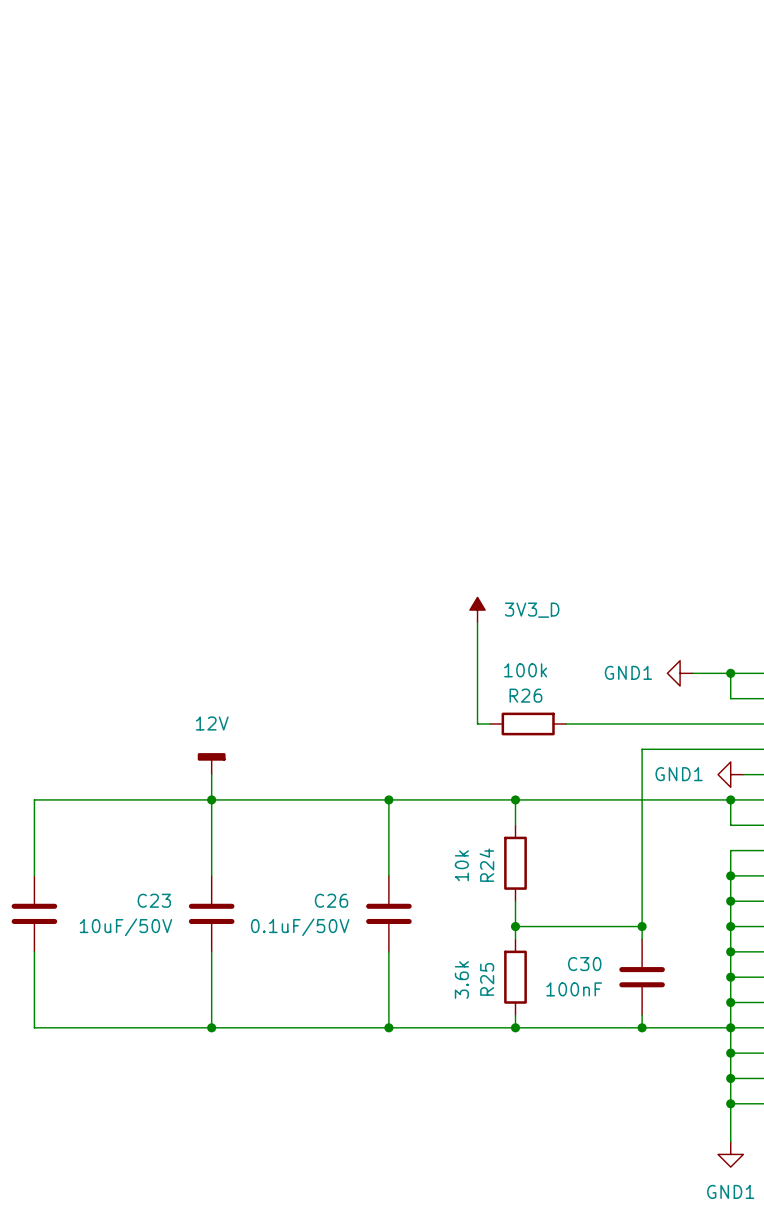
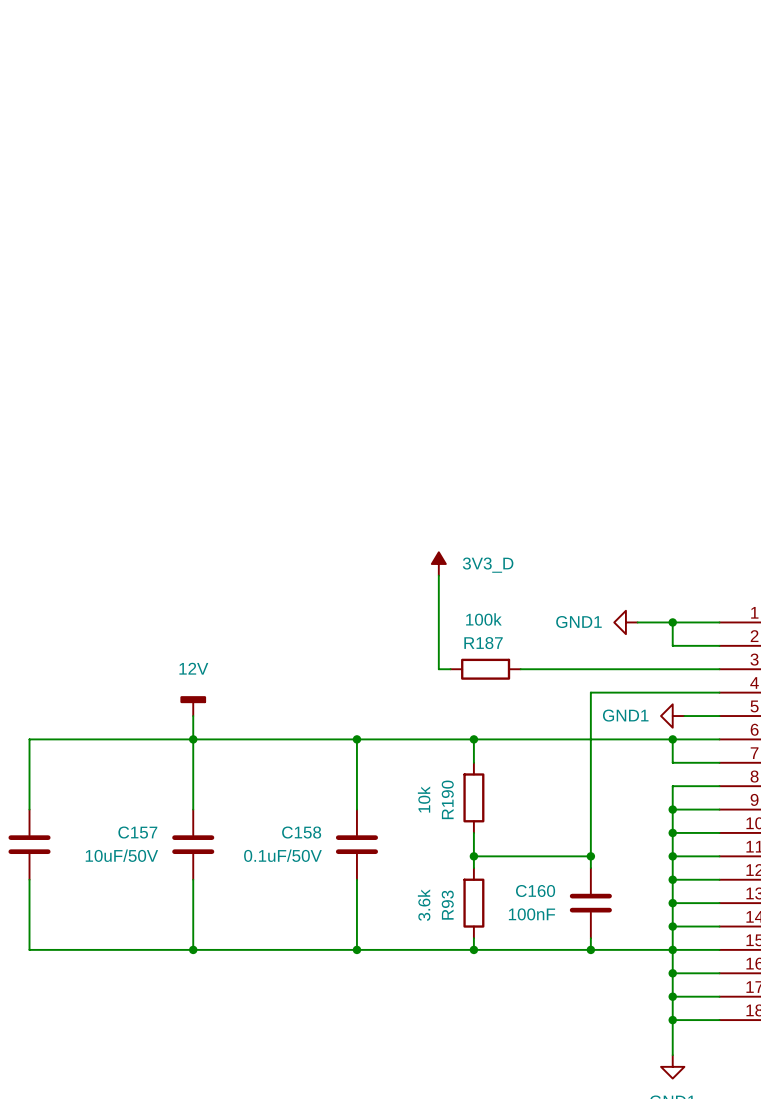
R26 name: R26 (525, 695) -> R187 (483, 643)
R24 name: R24 (486, 865) -> R190 (447, 799)
C23 name: C23 (154, 900) -> C157 (137, 832)
C26 name: C26 (331, 900) -> C158 (301, 832)
C30 name: C30 (584, 964) -> C160 (535, 890)
R25 name: R25 (487, 979) -> R93 (447, 905)

